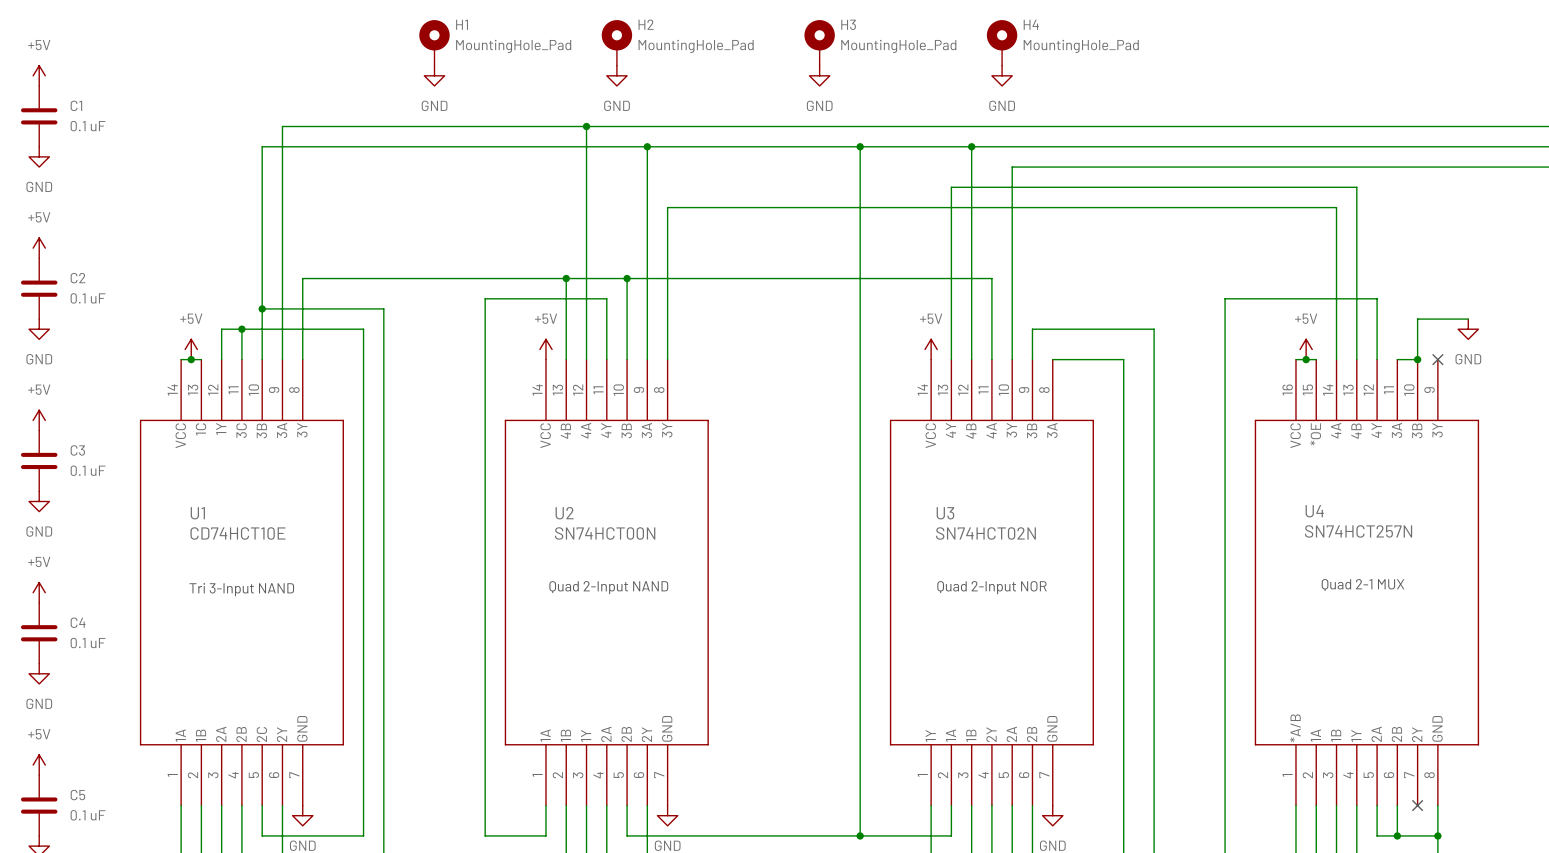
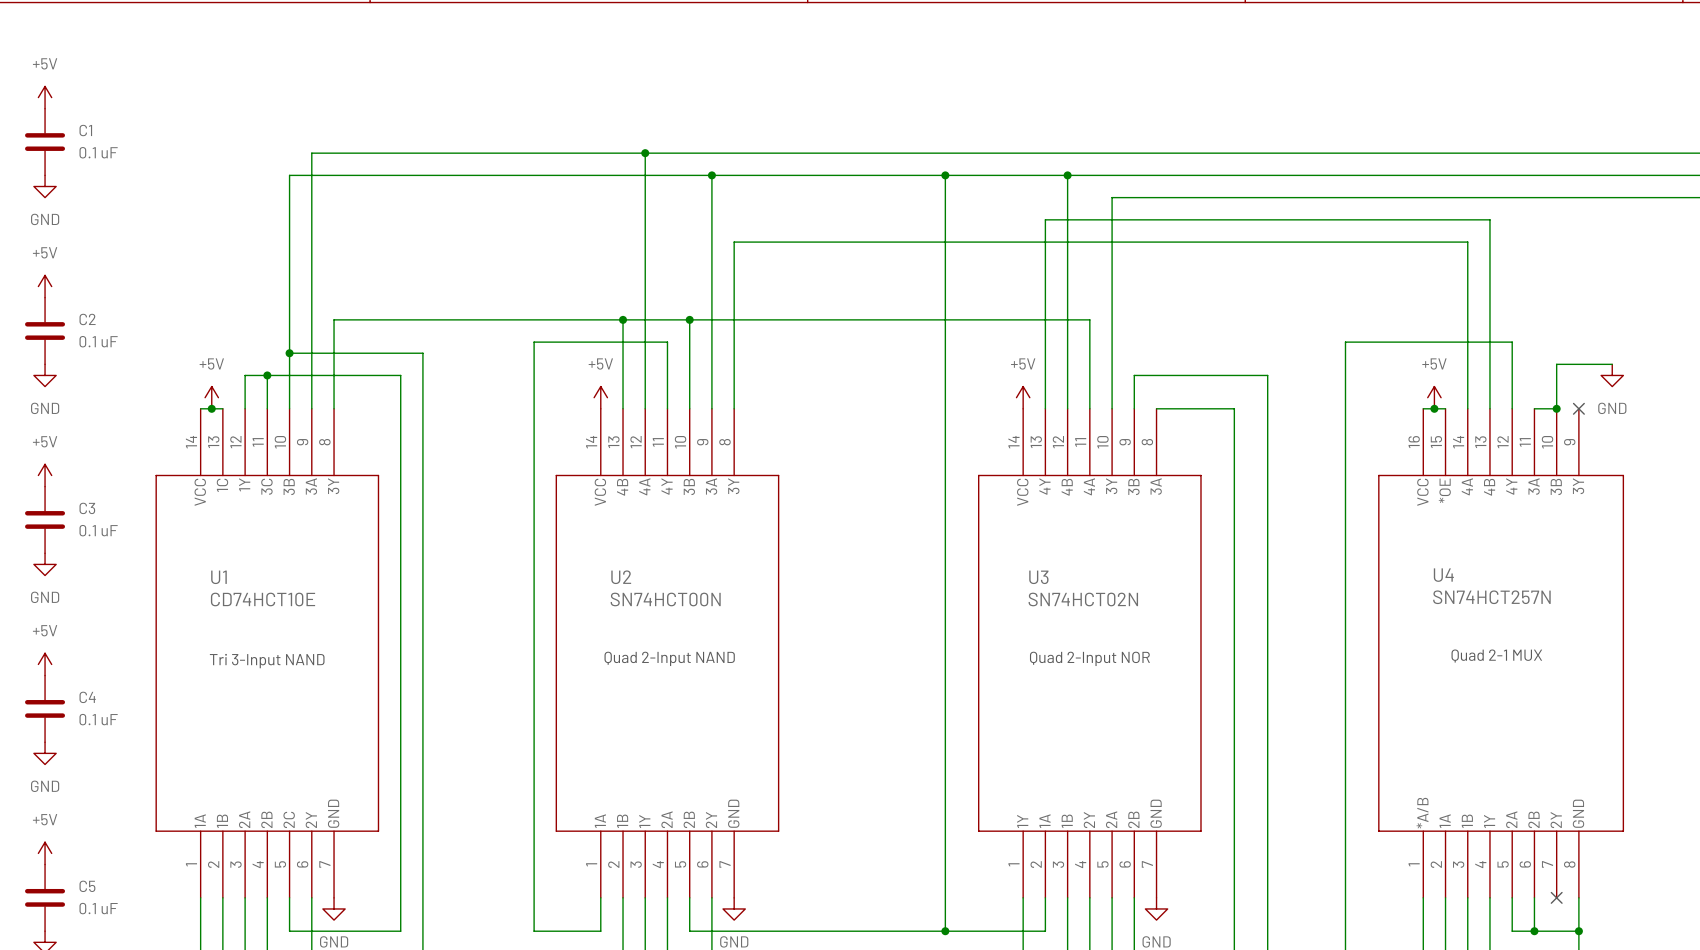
H1: MountingHole_Pad (434, 42) -> none
H2: MountingHole_Pad (616, 42) -> none
H3: MountingHole_Pad (819, 42) -> none
H4: MountingHole_Pad (1002, 42) -> none
power symbol: GND (434, 75) -> none
power symbol: GND (616, 75) -> none
power symbol: GND (819, 75) -> none
power symbol: GND (1002, 75) -> none

